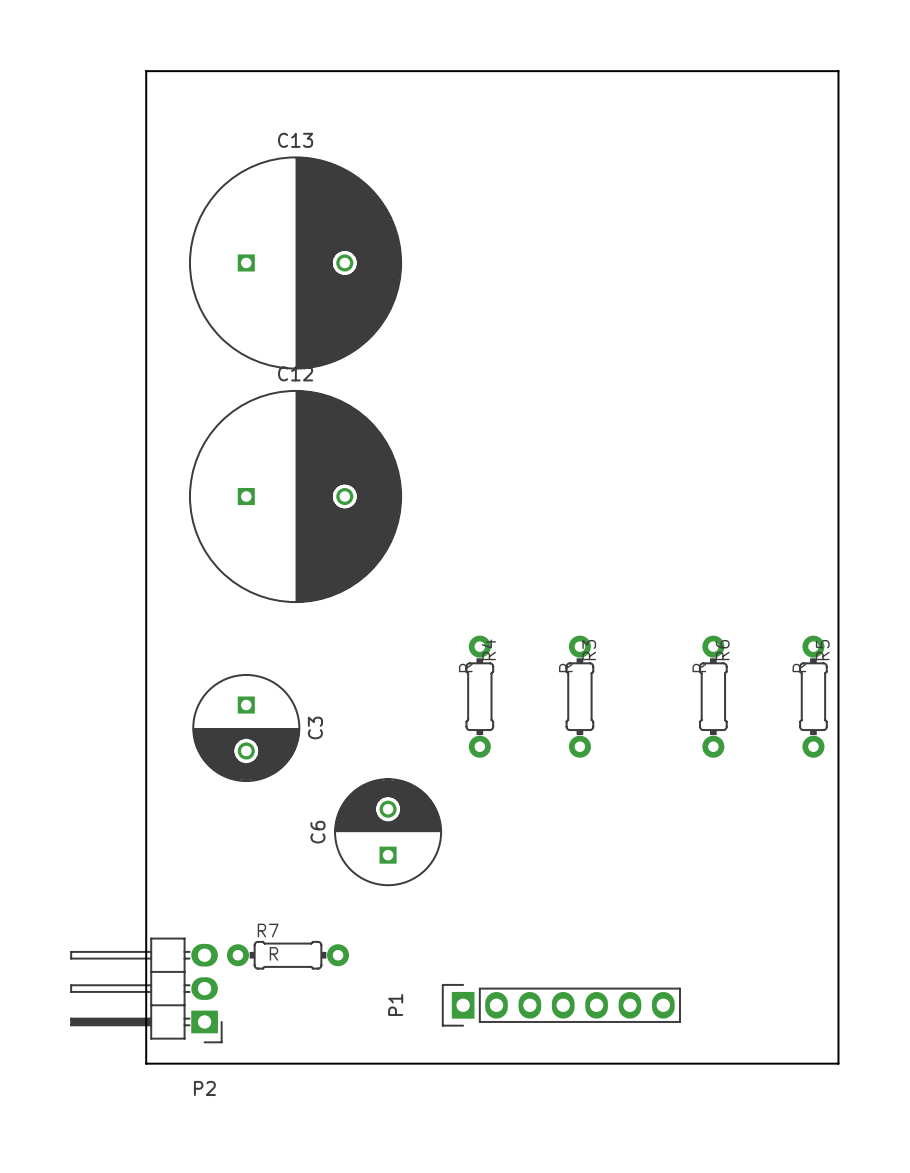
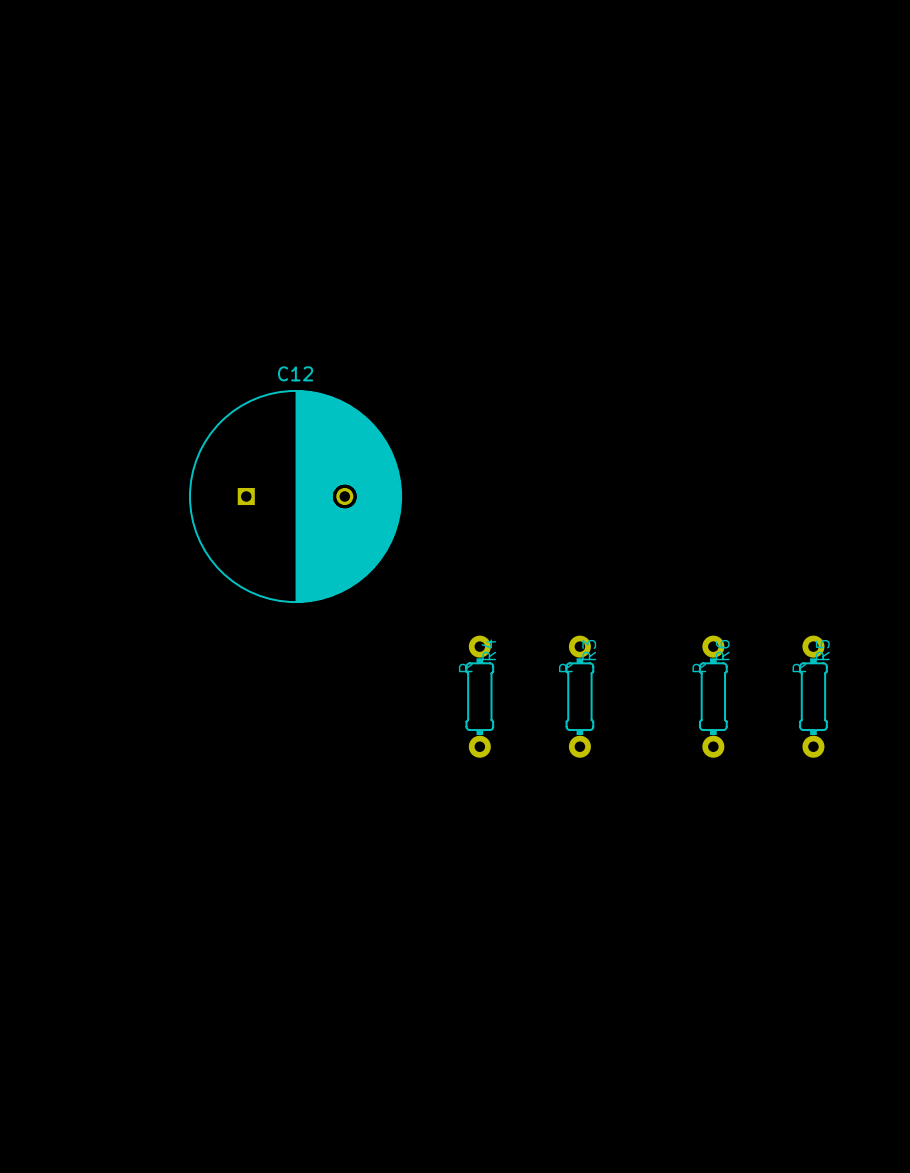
board edge: (146, 71) (146, 1063) (838, 1063) (838, 71) (146, 71) -> none
C13: (295, 262) -> none
C3: (246, 728) -> none
C6: (388, 832) -> none
R7: R (287, 955) -> none
P2: (146, 990) -> none
P1: (561, 1005) -> none

